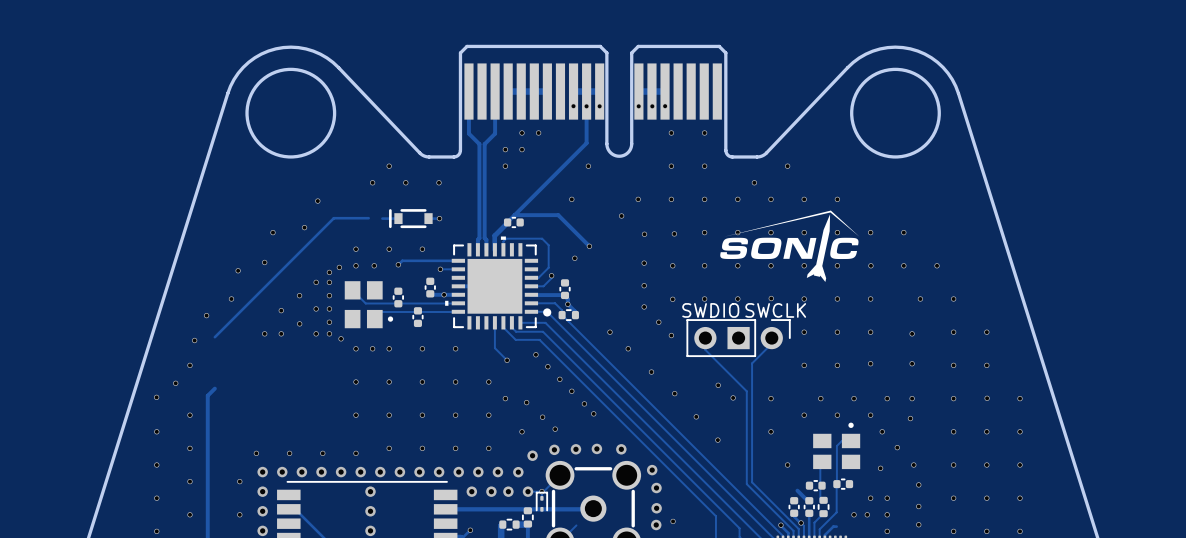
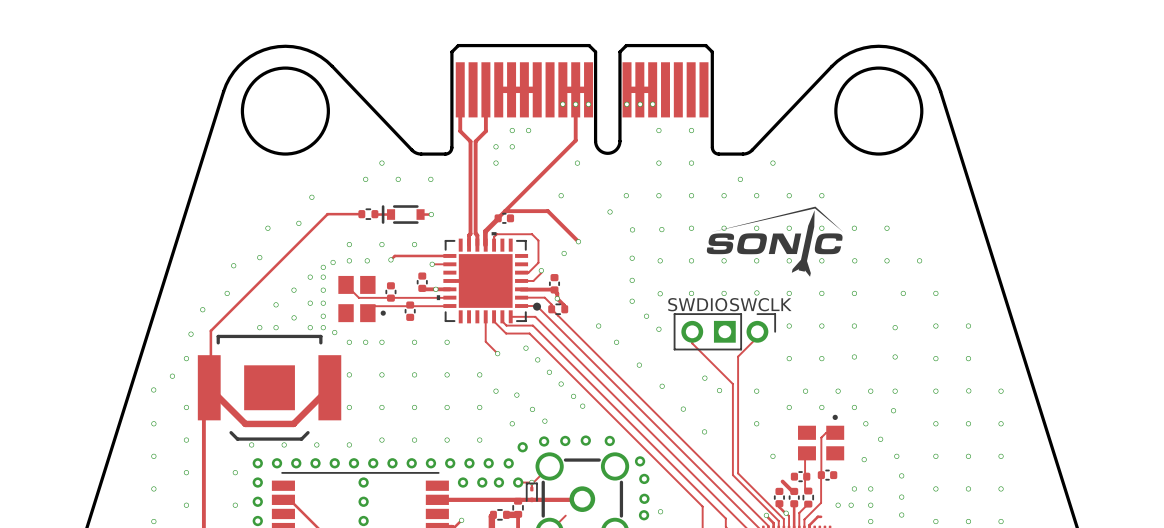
part: none -> (368, 214)
track: none -> (210, 330) (210, 381)
track: none -> (209, 387) (245, 423) (293, 423) (329, 387)
part: none -> (269, 387)

